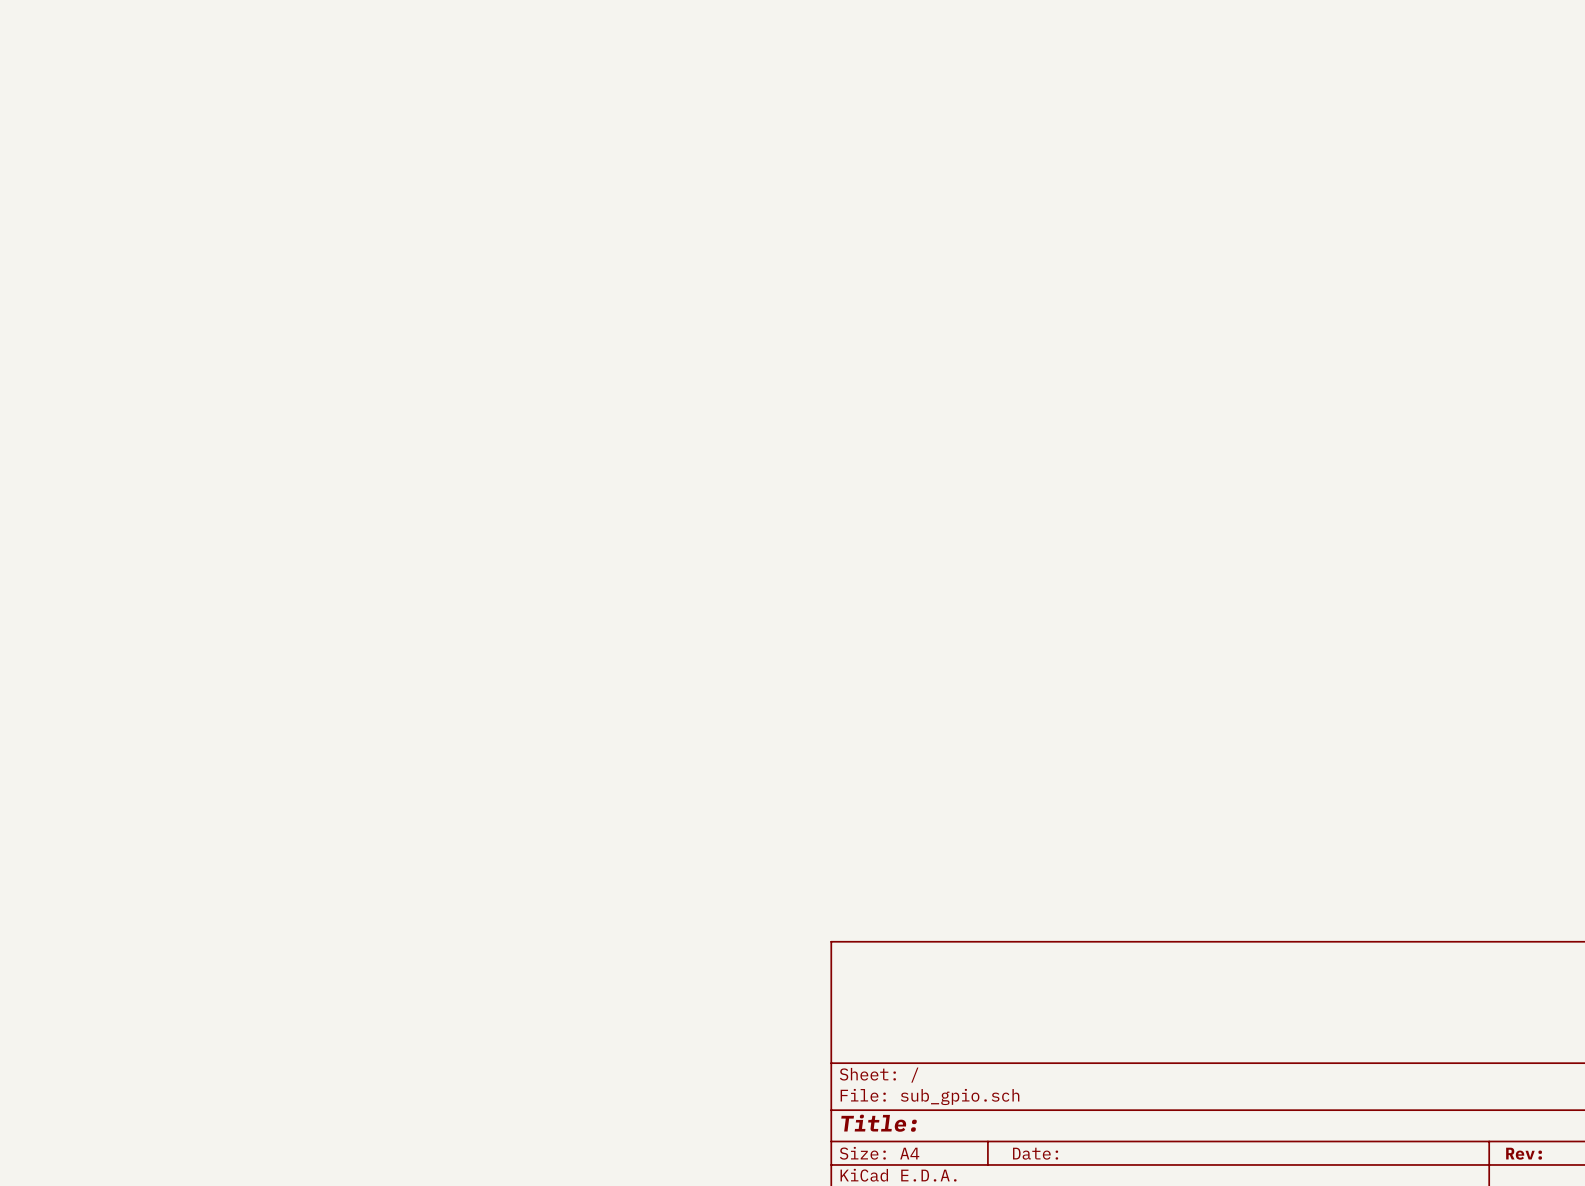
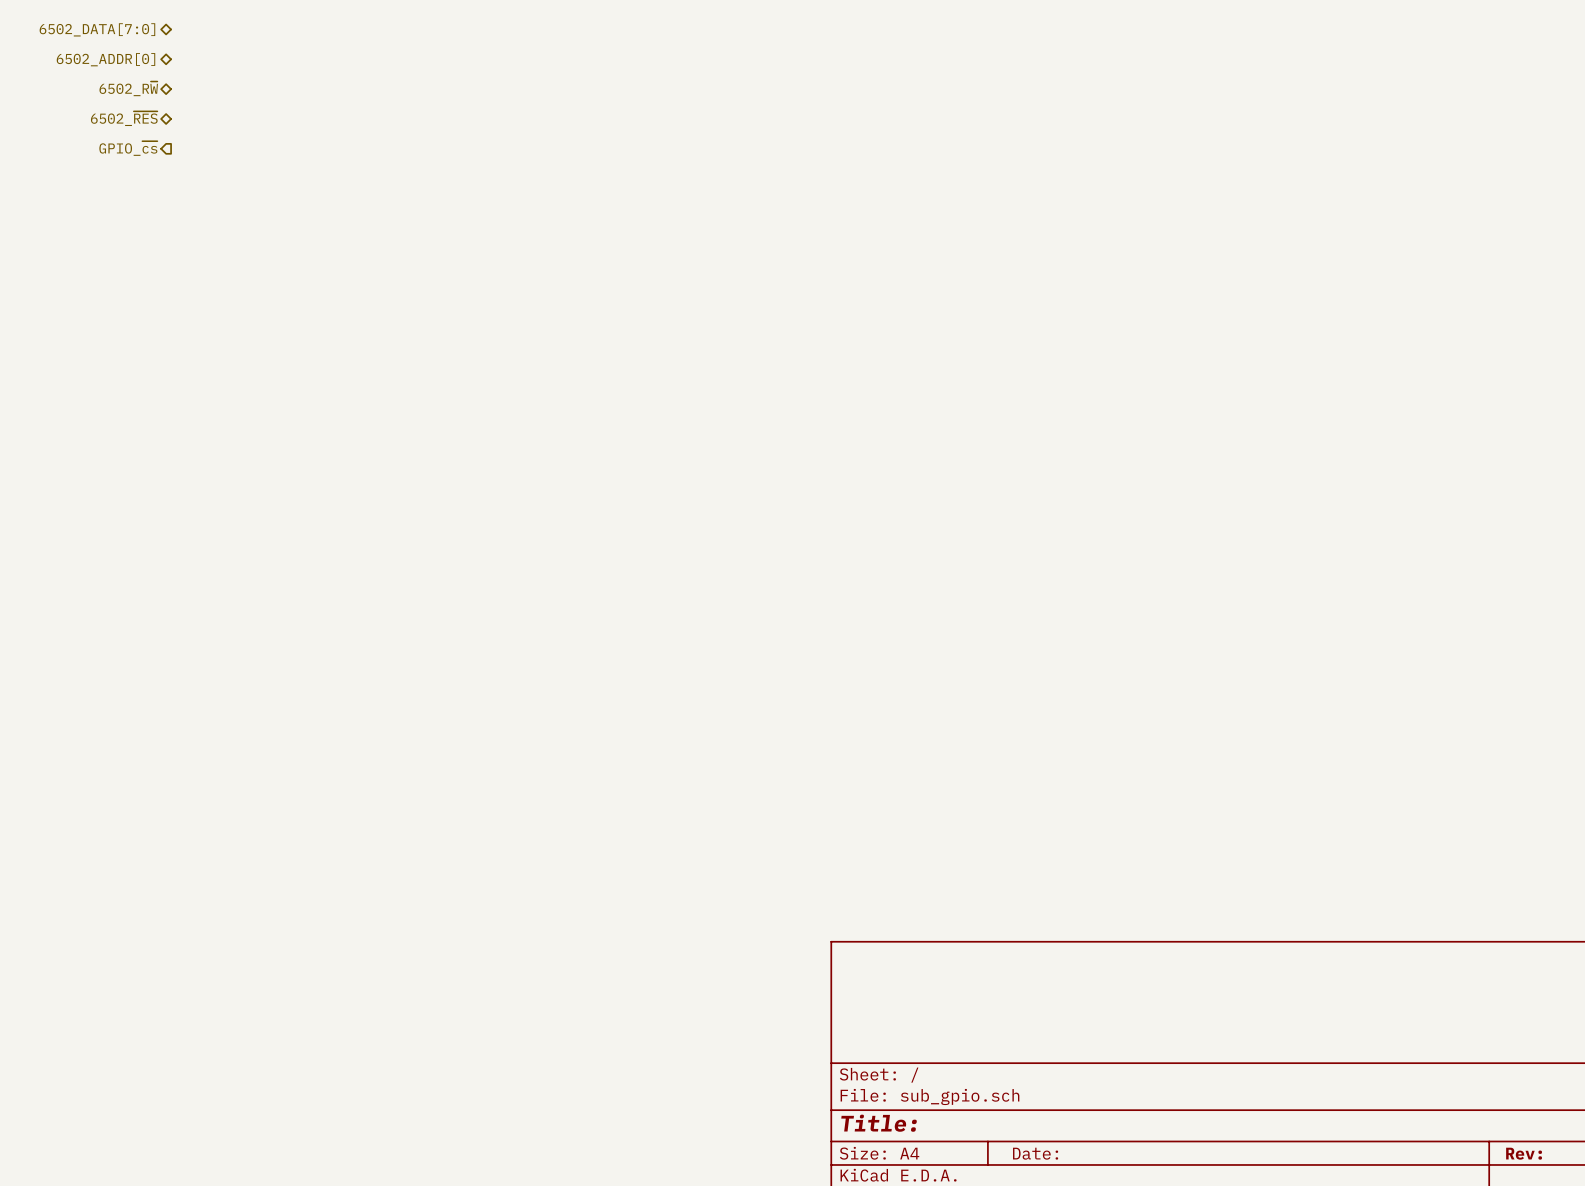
hierarchical label: none -> 6502_DATA[7:0] (97, 29)
hierarchical label: none -> 6502_ADDR[0] (105, 59)
hierarchical label: none -> 6502_R~{W} (128, 88)
hierarchical label: none -> 6502_~{RES} (124, 118)
hierarchical label: none -> GPIO_~{cs} (128, 148)

